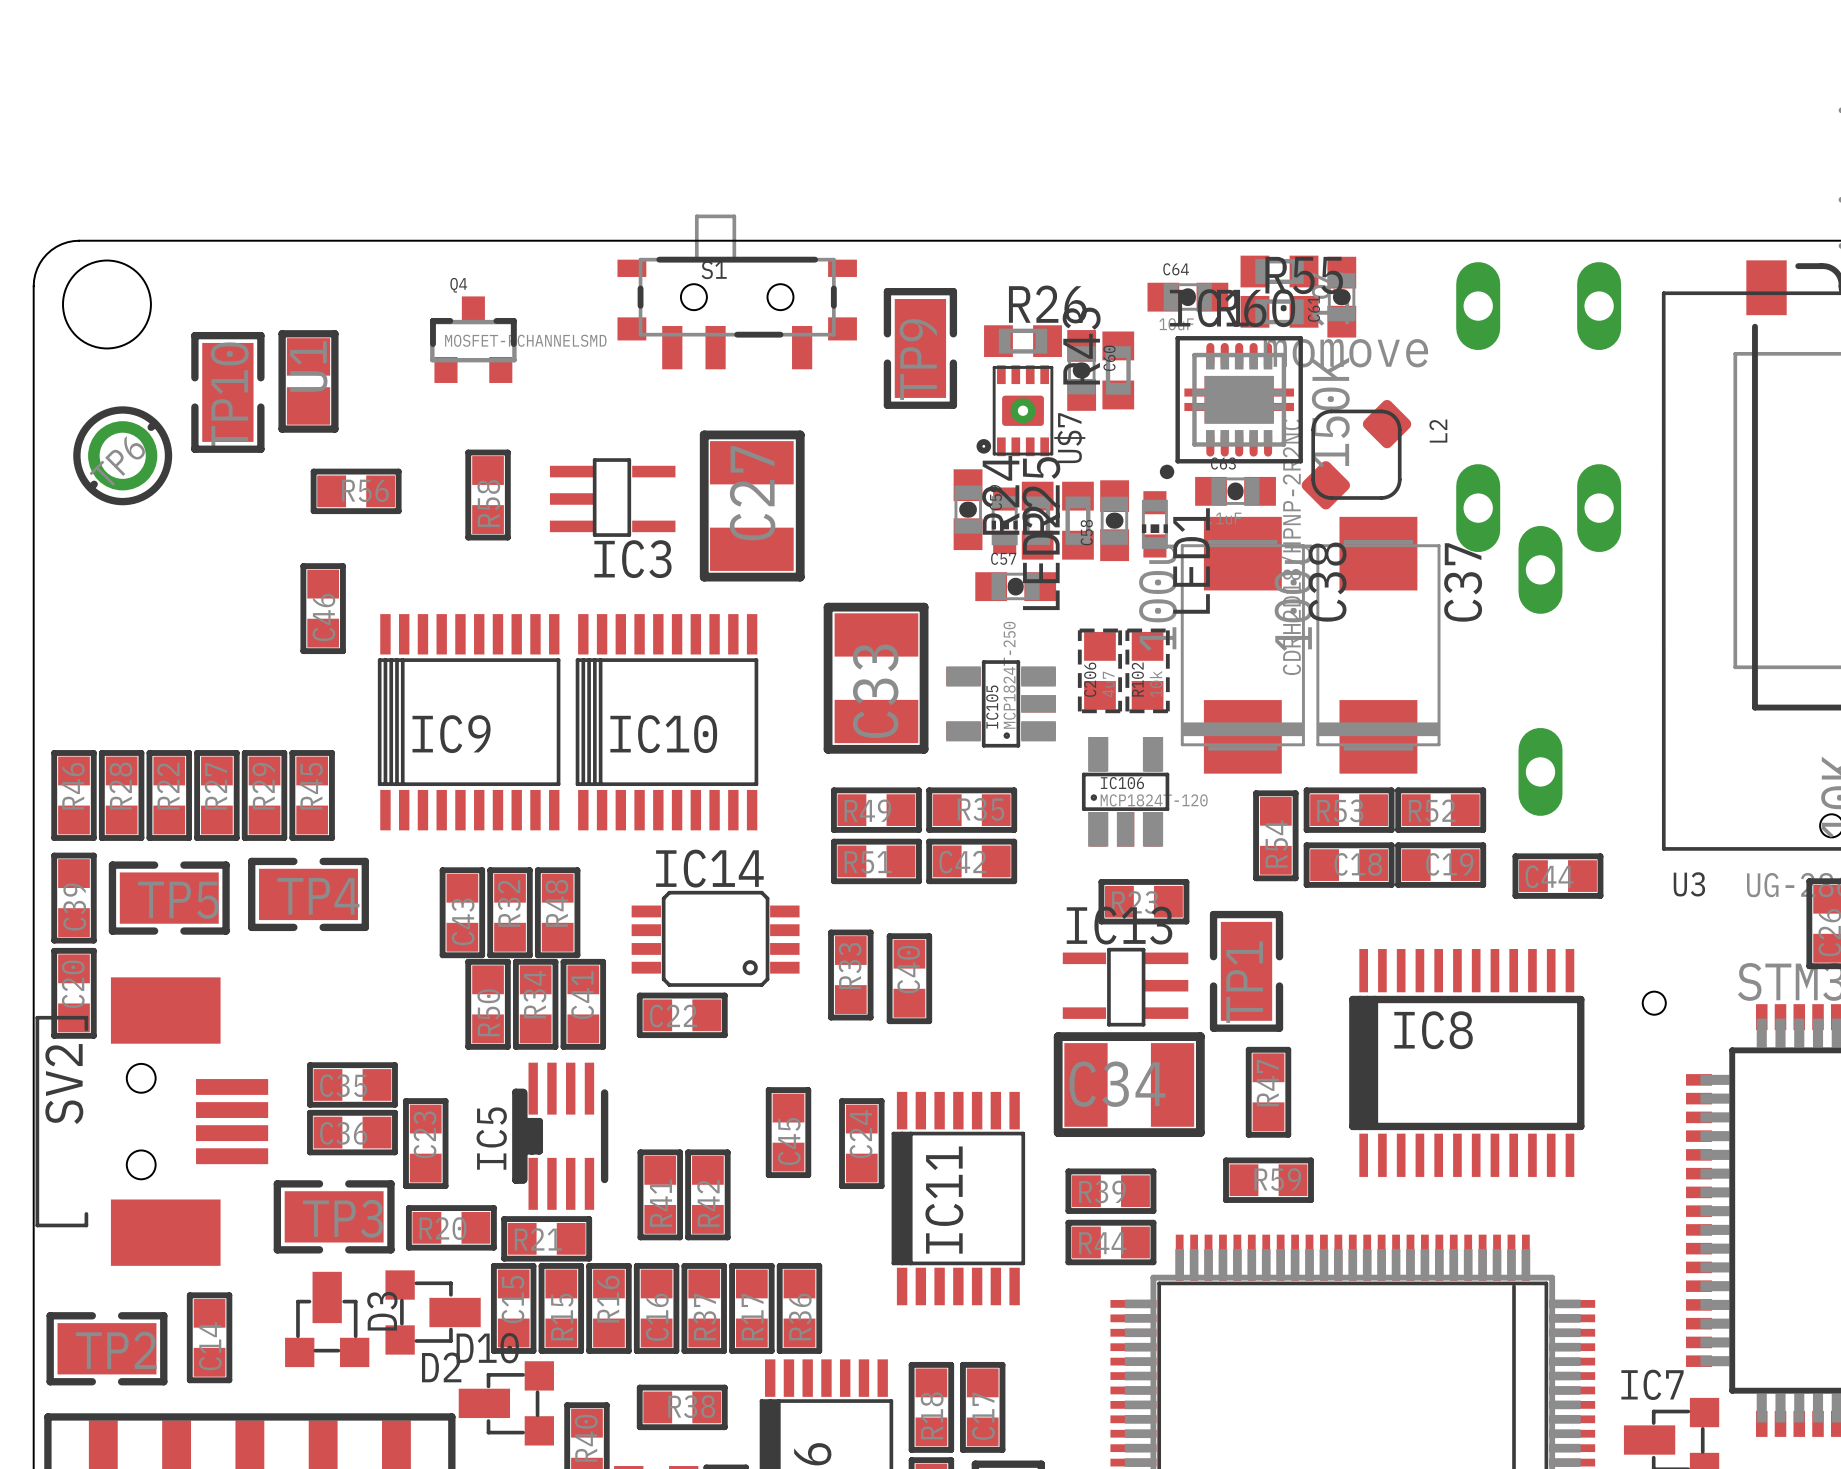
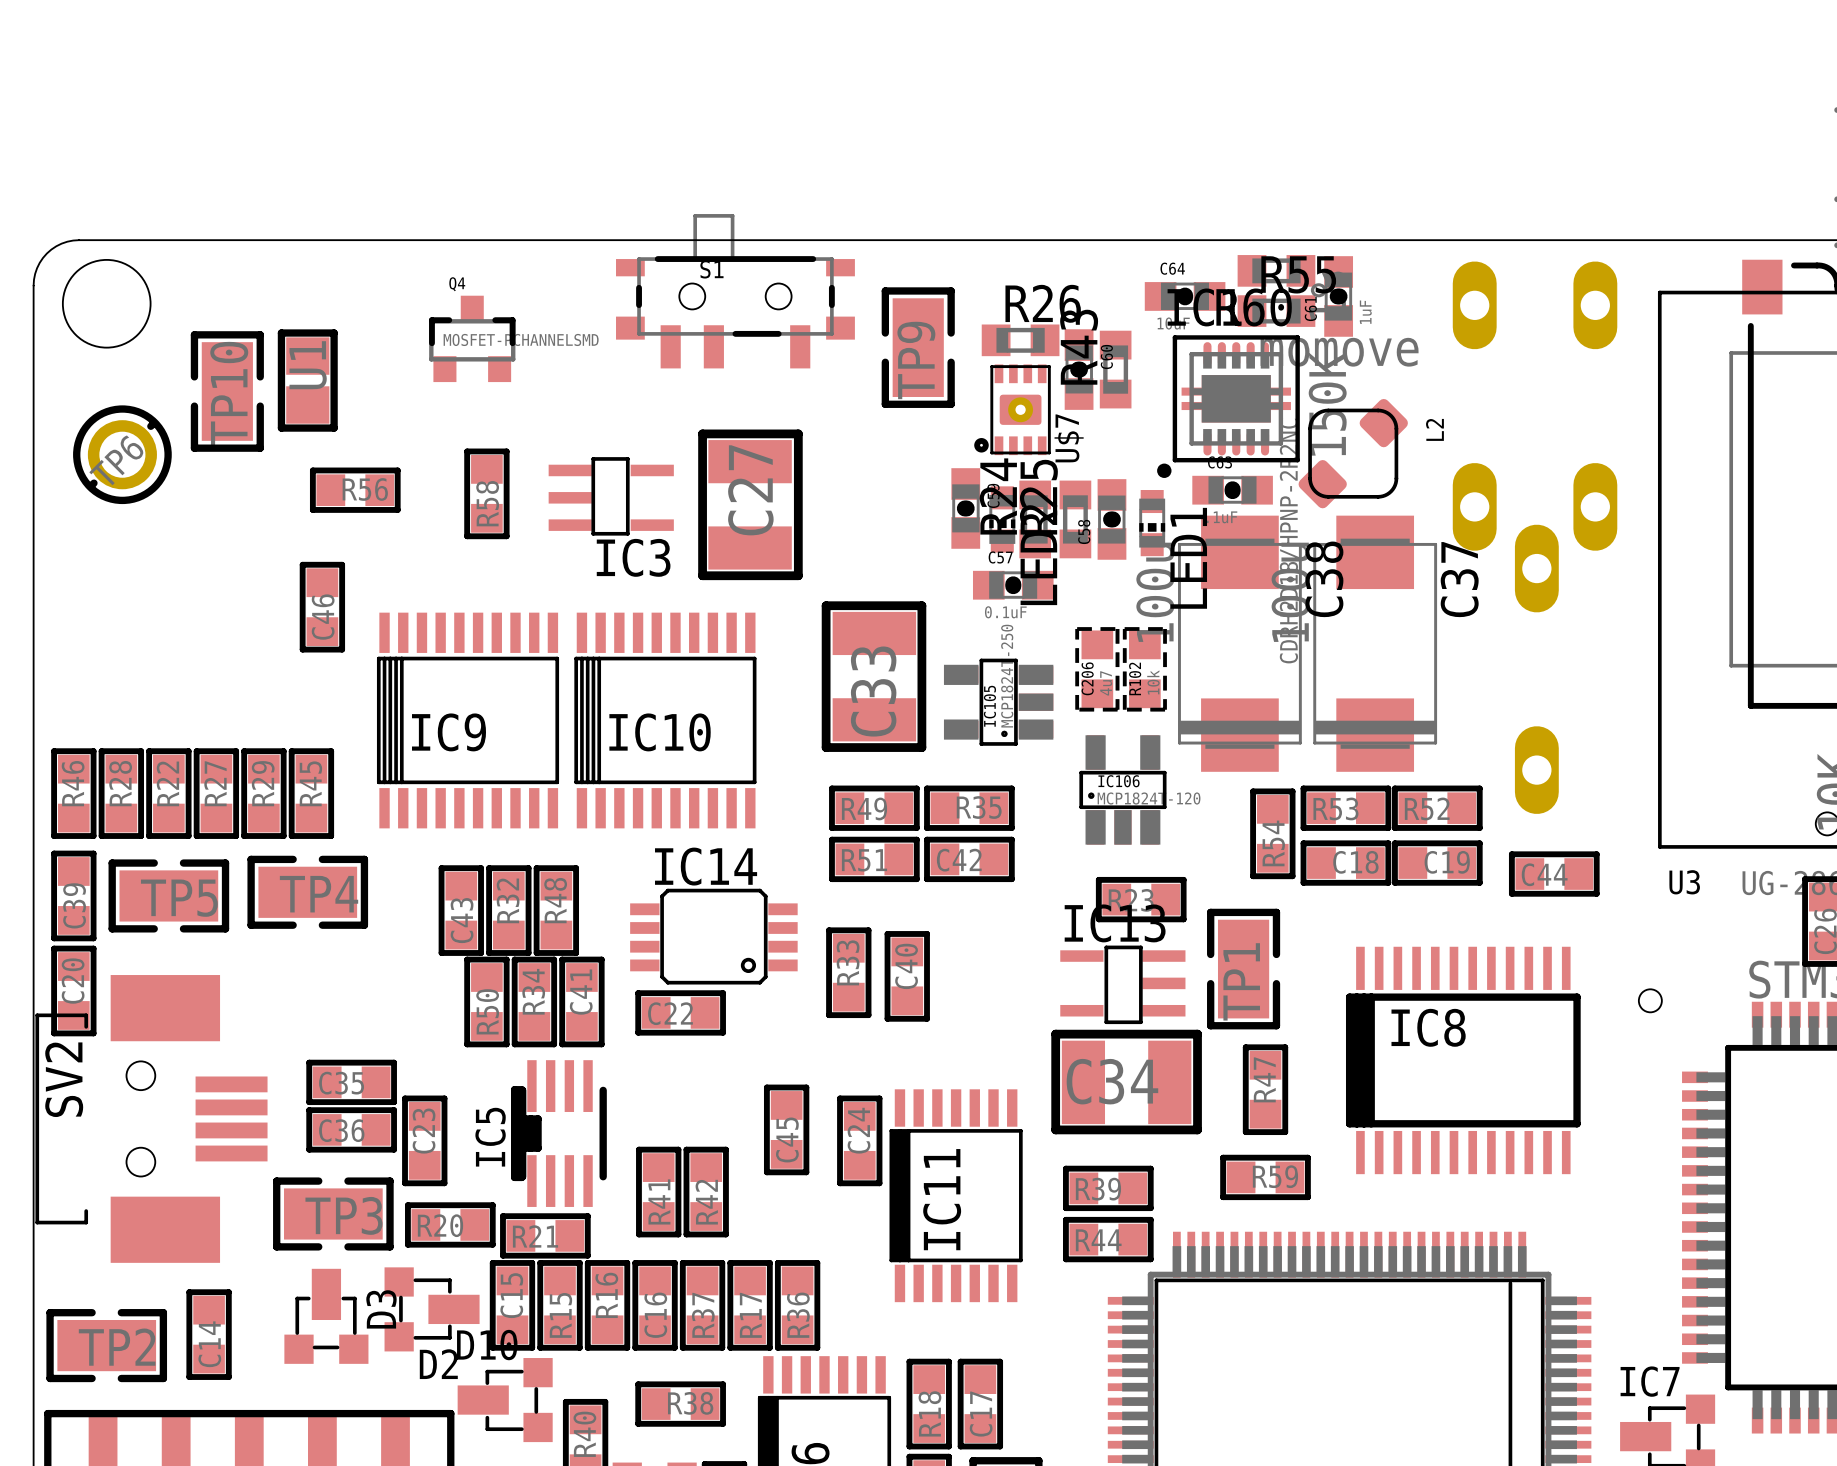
C61 value: none -> 1uF (1365, 312)
C57 value: none -> 0.1uF (1005, 612)

